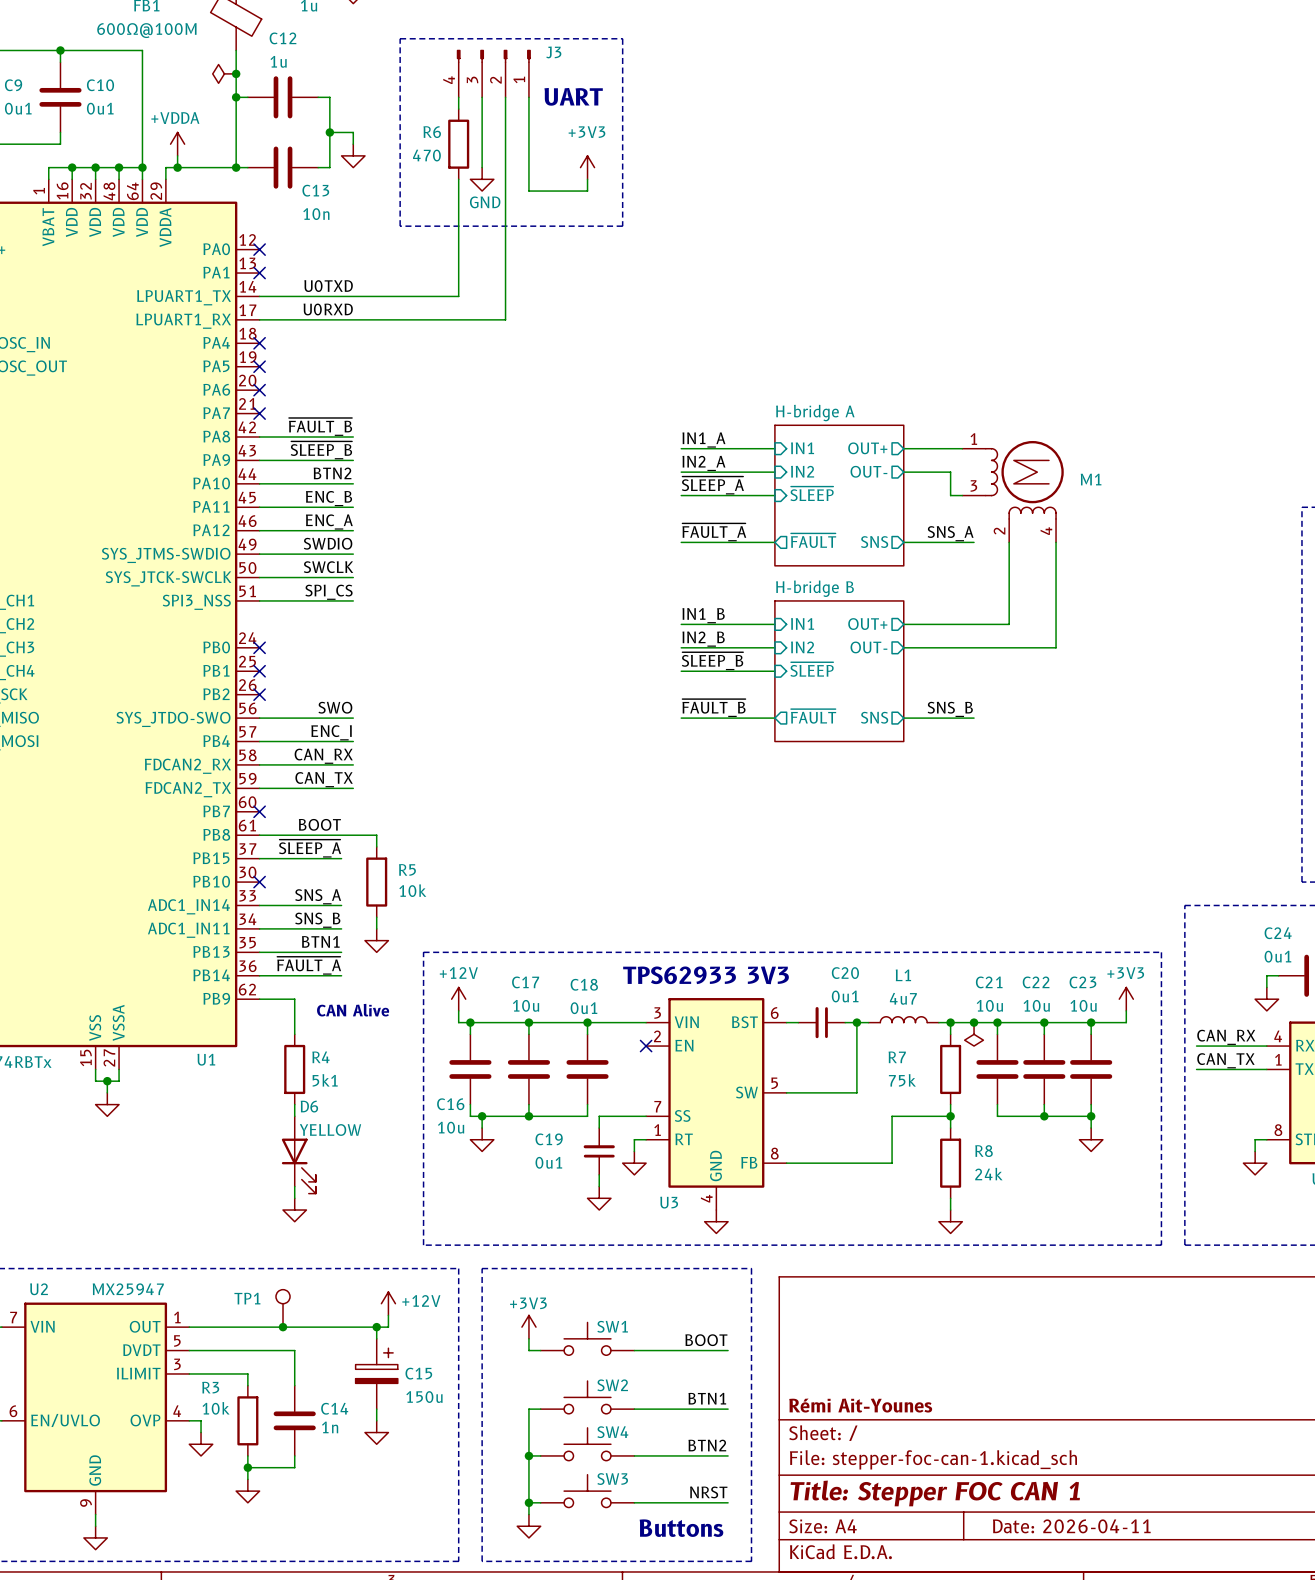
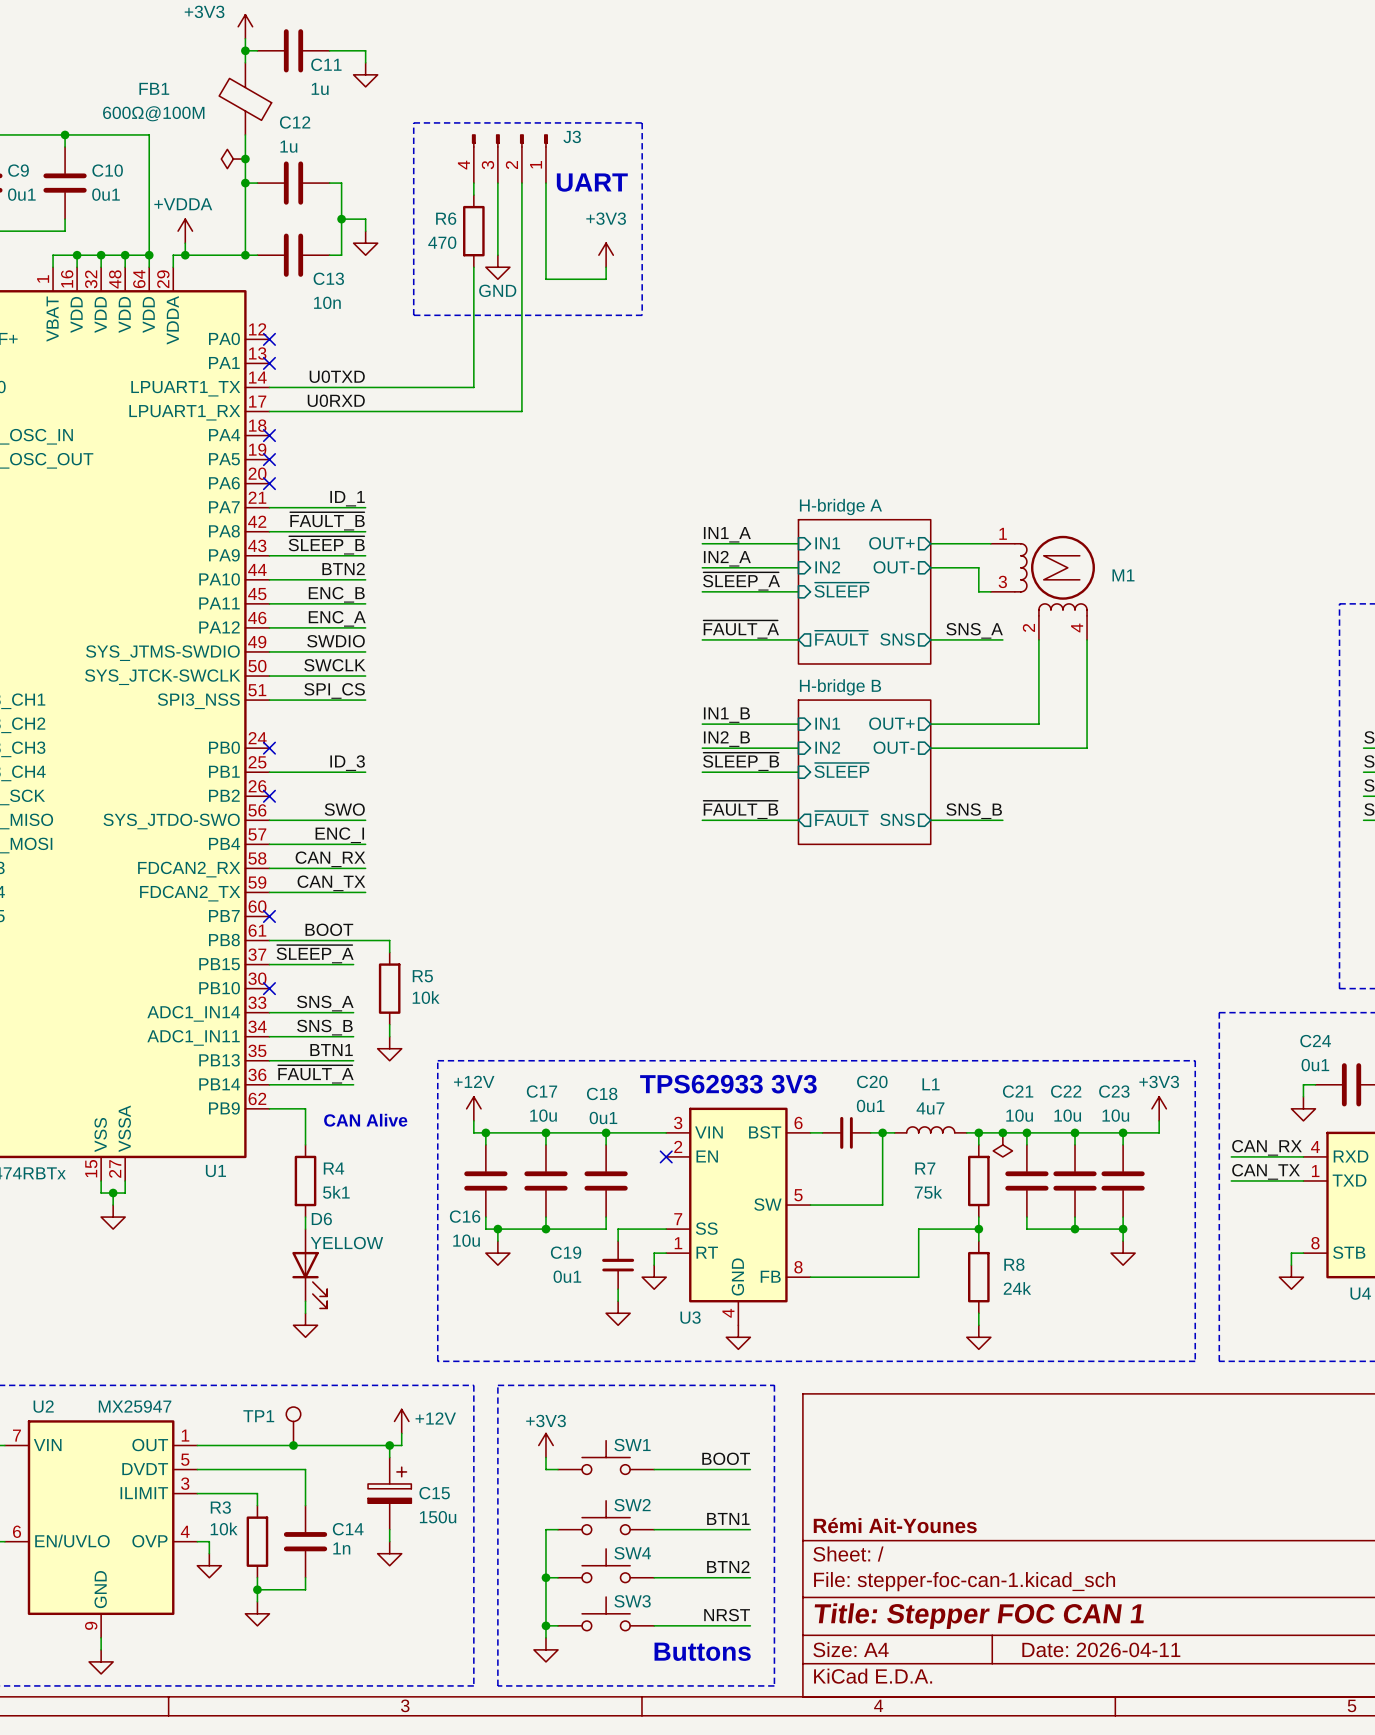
label: none -> ID_1 (347, 498)
wire: none -> (269, 507) (365, 507)
no-connect mark: (259, 413) -> none
label: none -> ID_3 (347, 763)
wire: none -> (269, 772) (365, 772)
no-connect mark: (259, 671) -> none

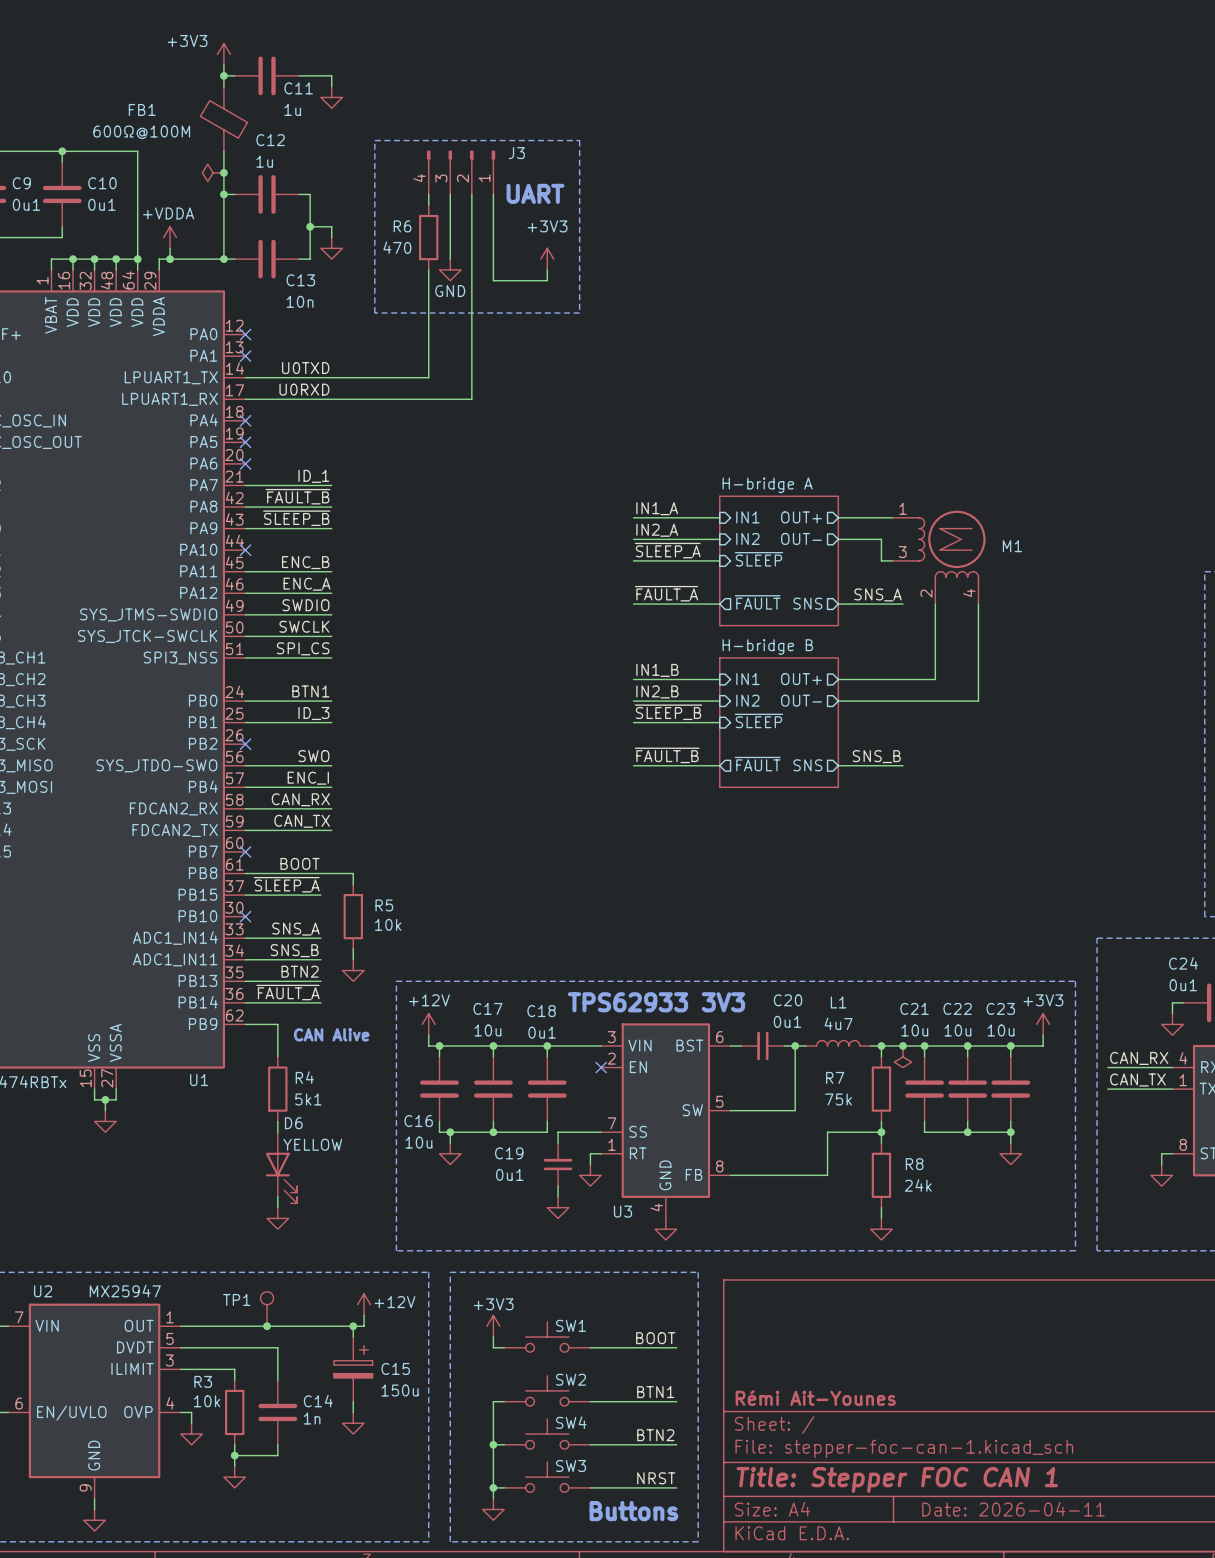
label: BTN2 (343, 569) -> none
wire: (269, 579) (365, 579) -> (245, 701) (331, 701)
no-connect mark: none -> (245, 550)
label: none -> BTN1 (310, 691)
no-connect mark: (269, 748) -> none
label: BTN1 (331, 1050) -> BTN2 (300, 971)

